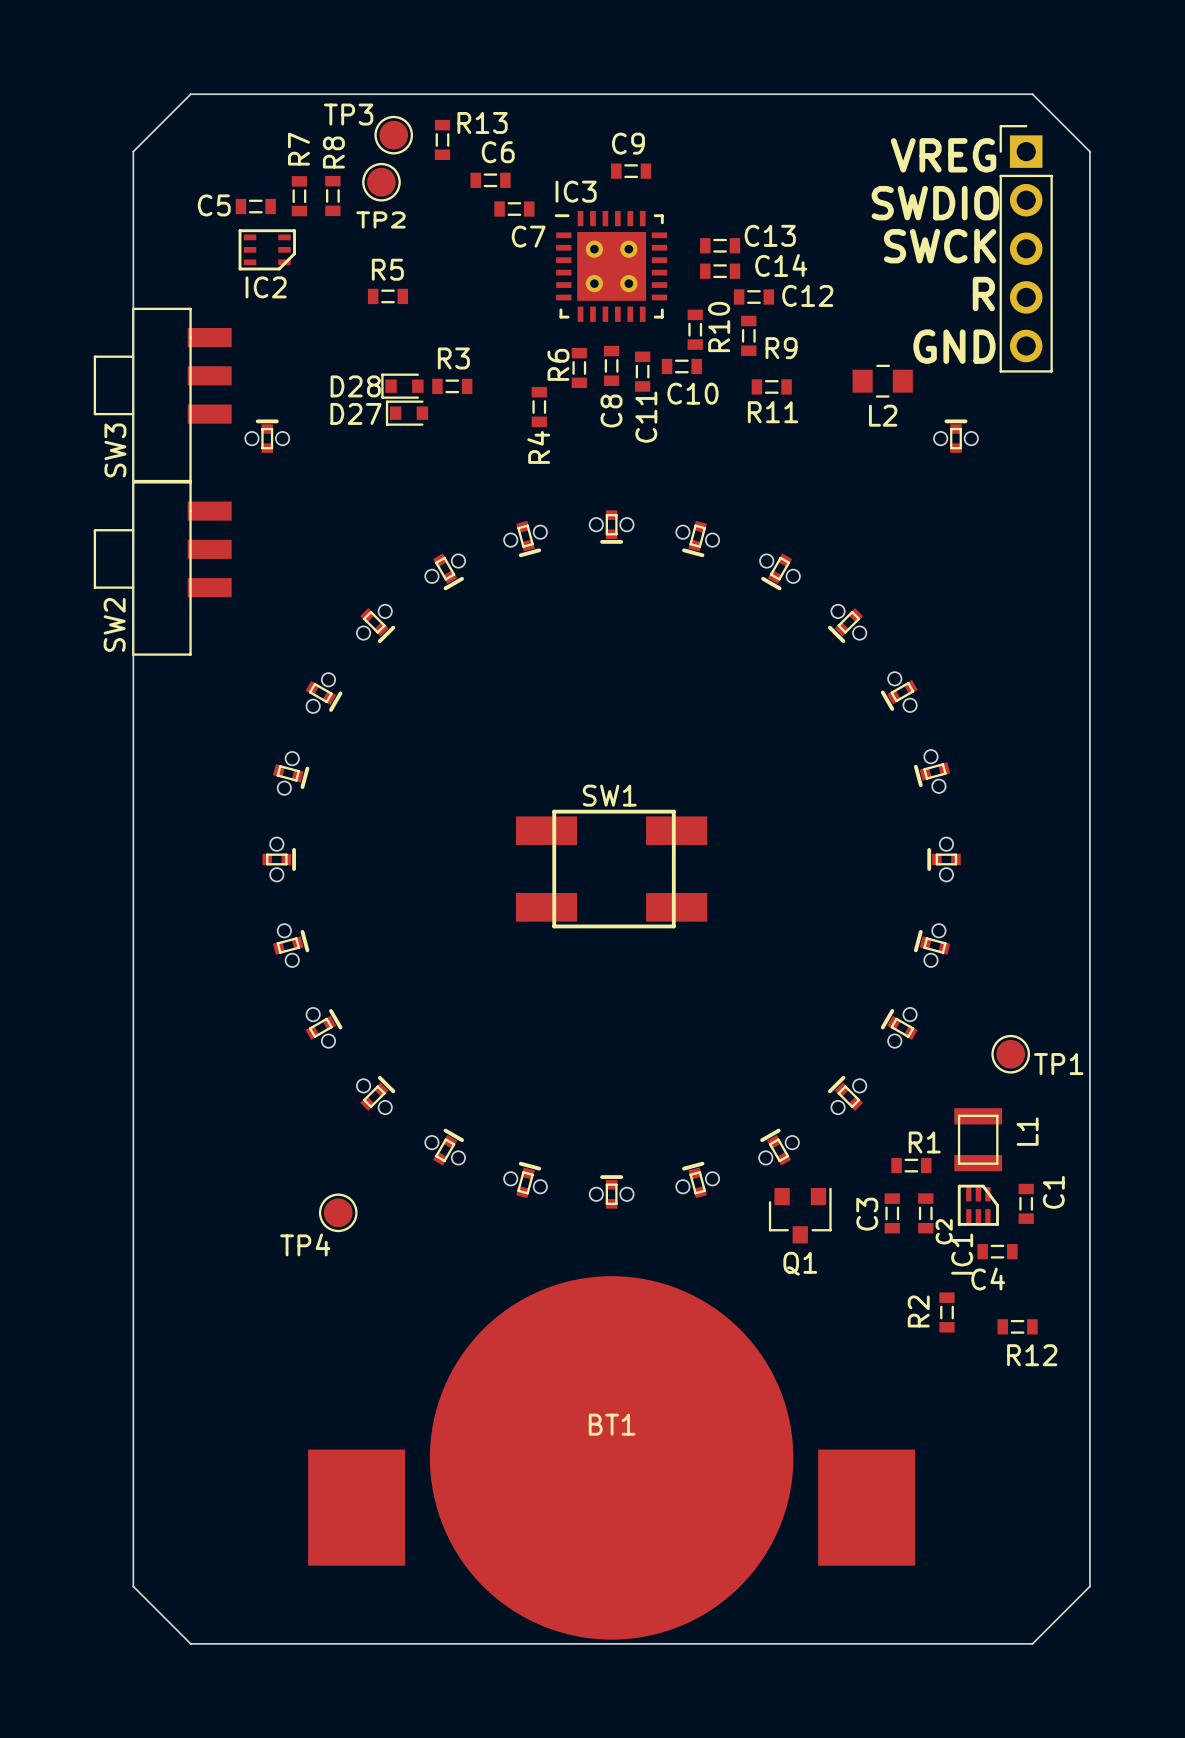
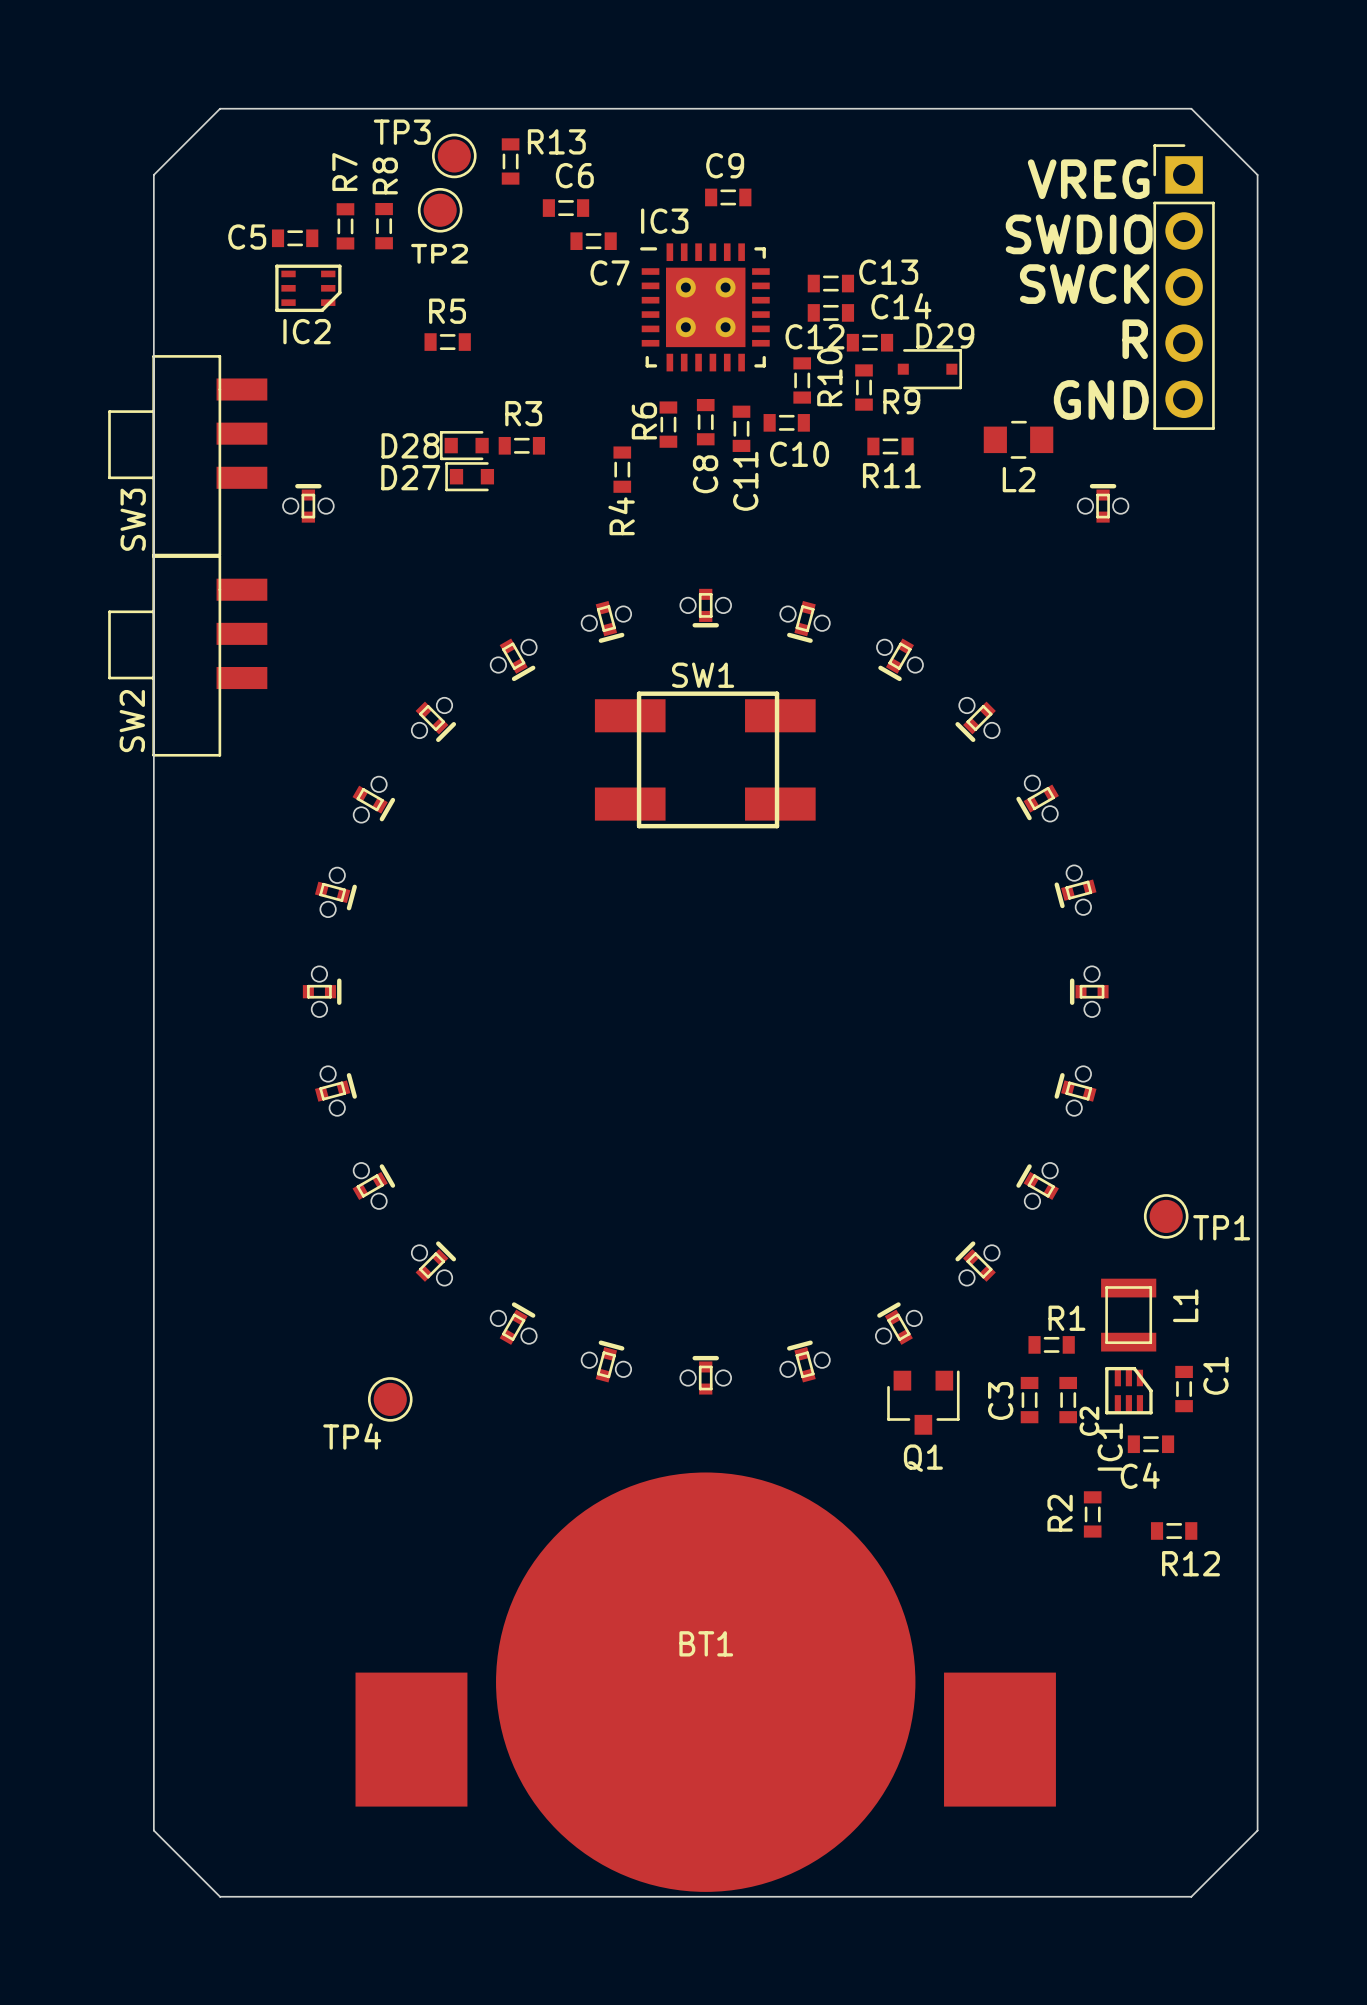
C12 name position: C12 (807, 295) -> C12 (814, 336)
D29: none -> (929, 369)
SW1 position: (611, 869) -> (705, 759)

